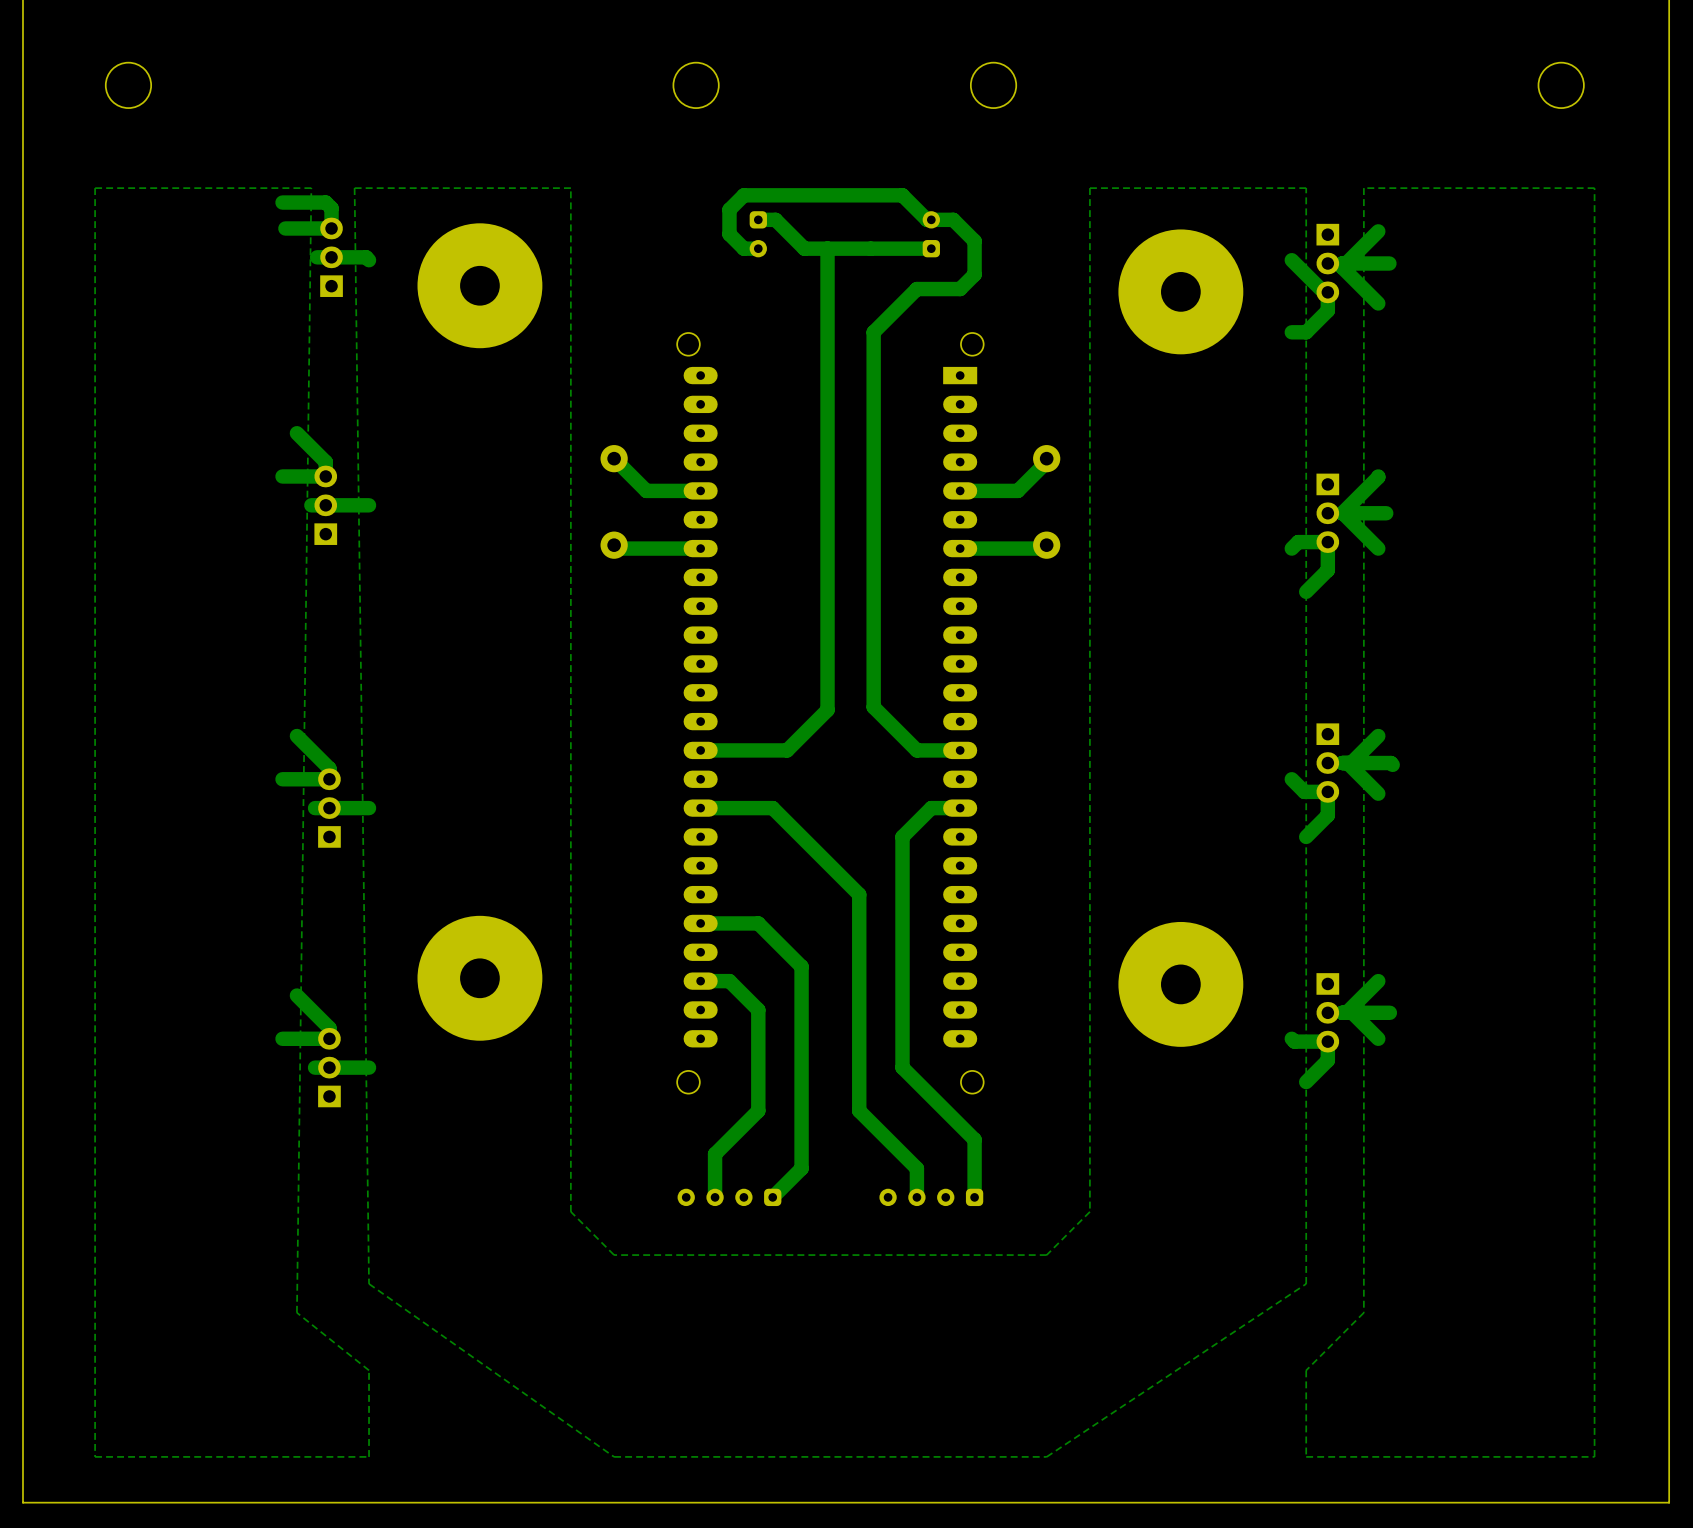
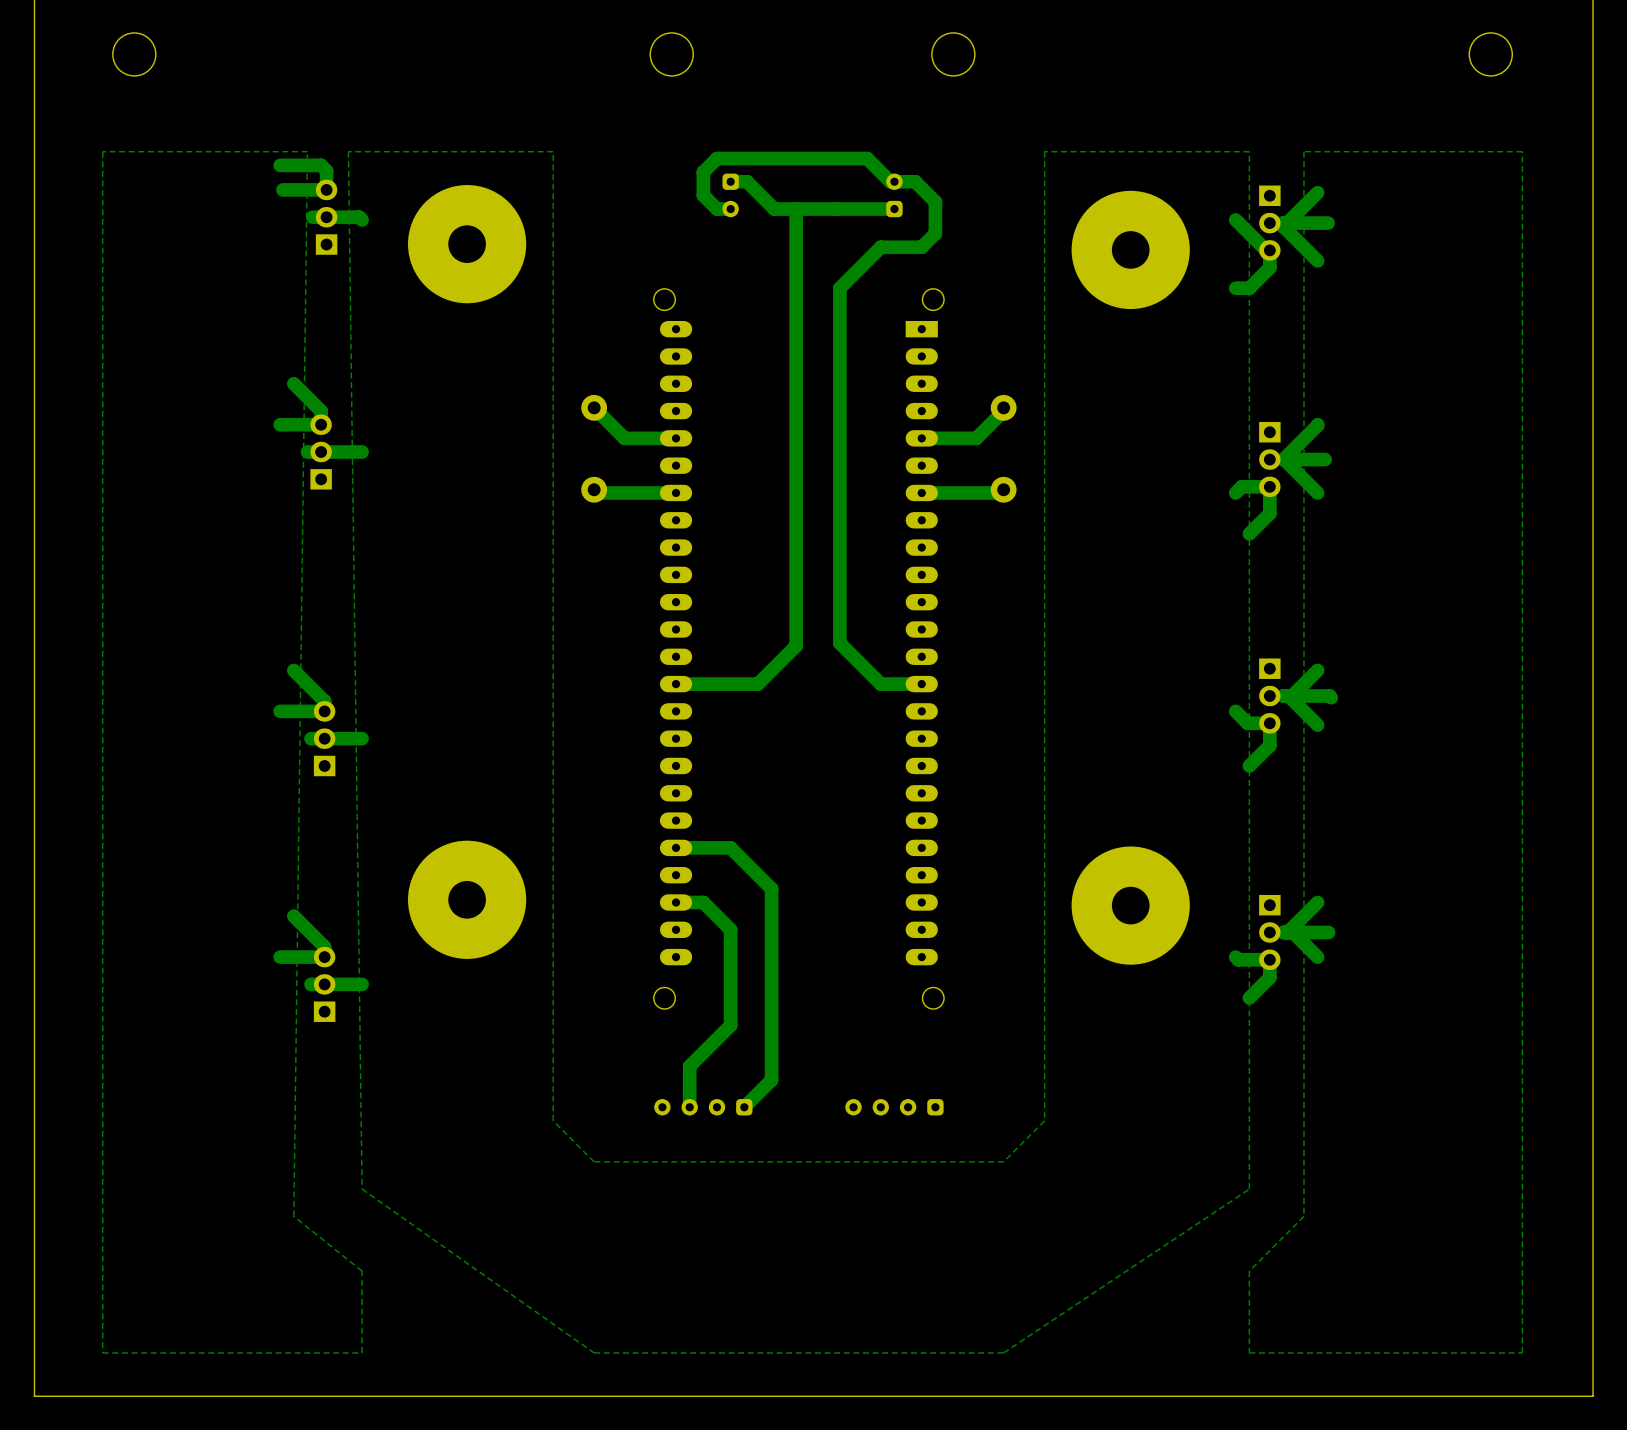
bottom track: (700, 808) (772, 808) (859, 894) (859, 1110) (916, 1168) (916, 1197) -> none
bottom track: (960, 808) (931, 808) (902, 836) (902, 1067) (974, 1139) (974, 1197) -> none

